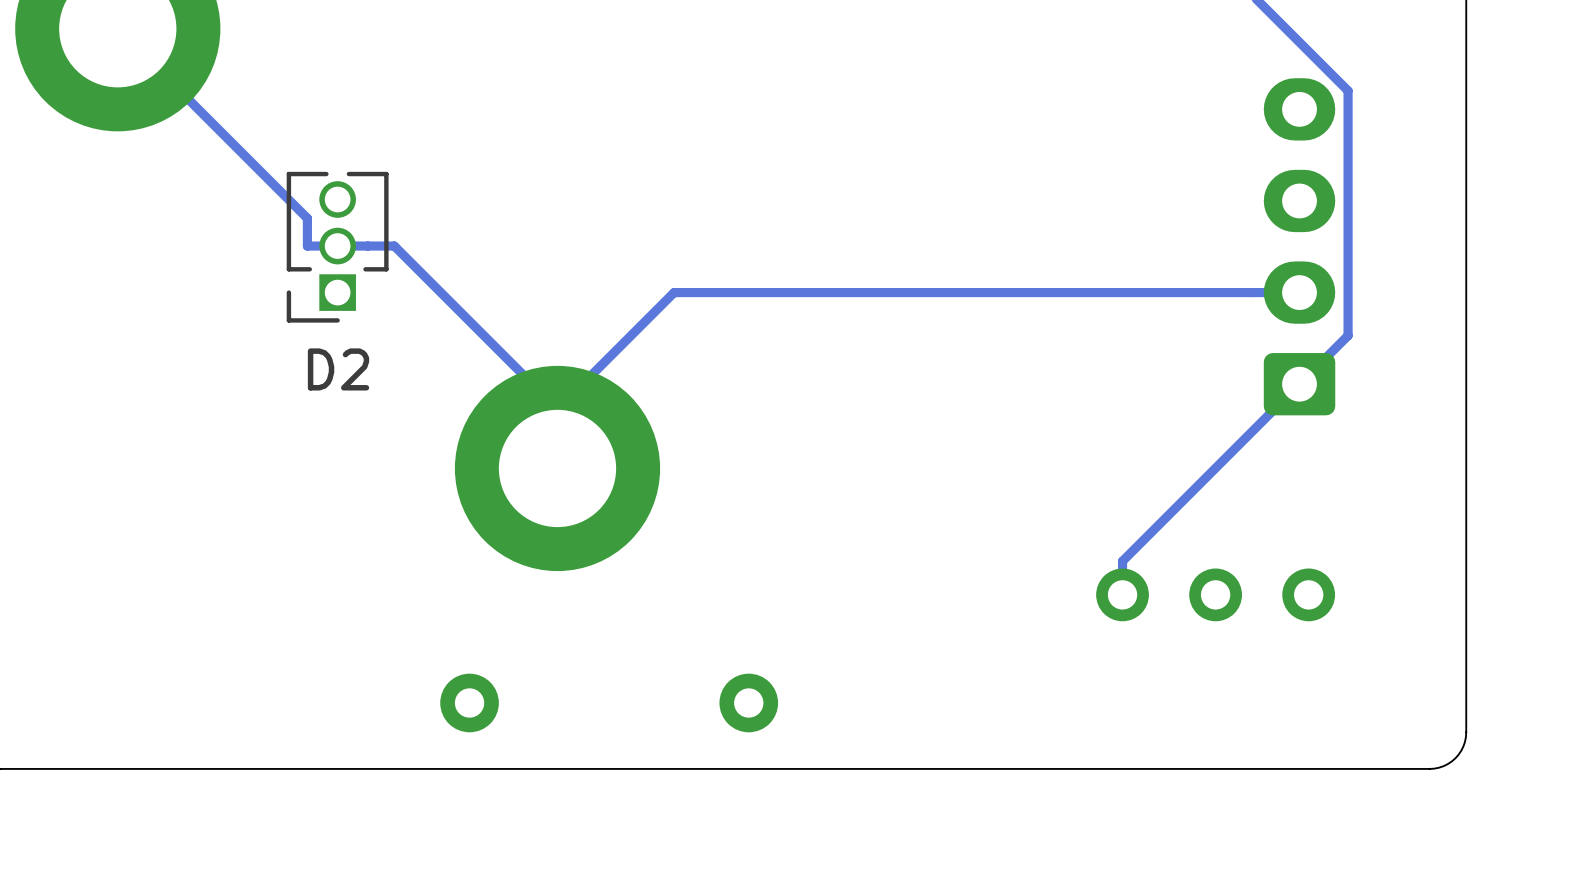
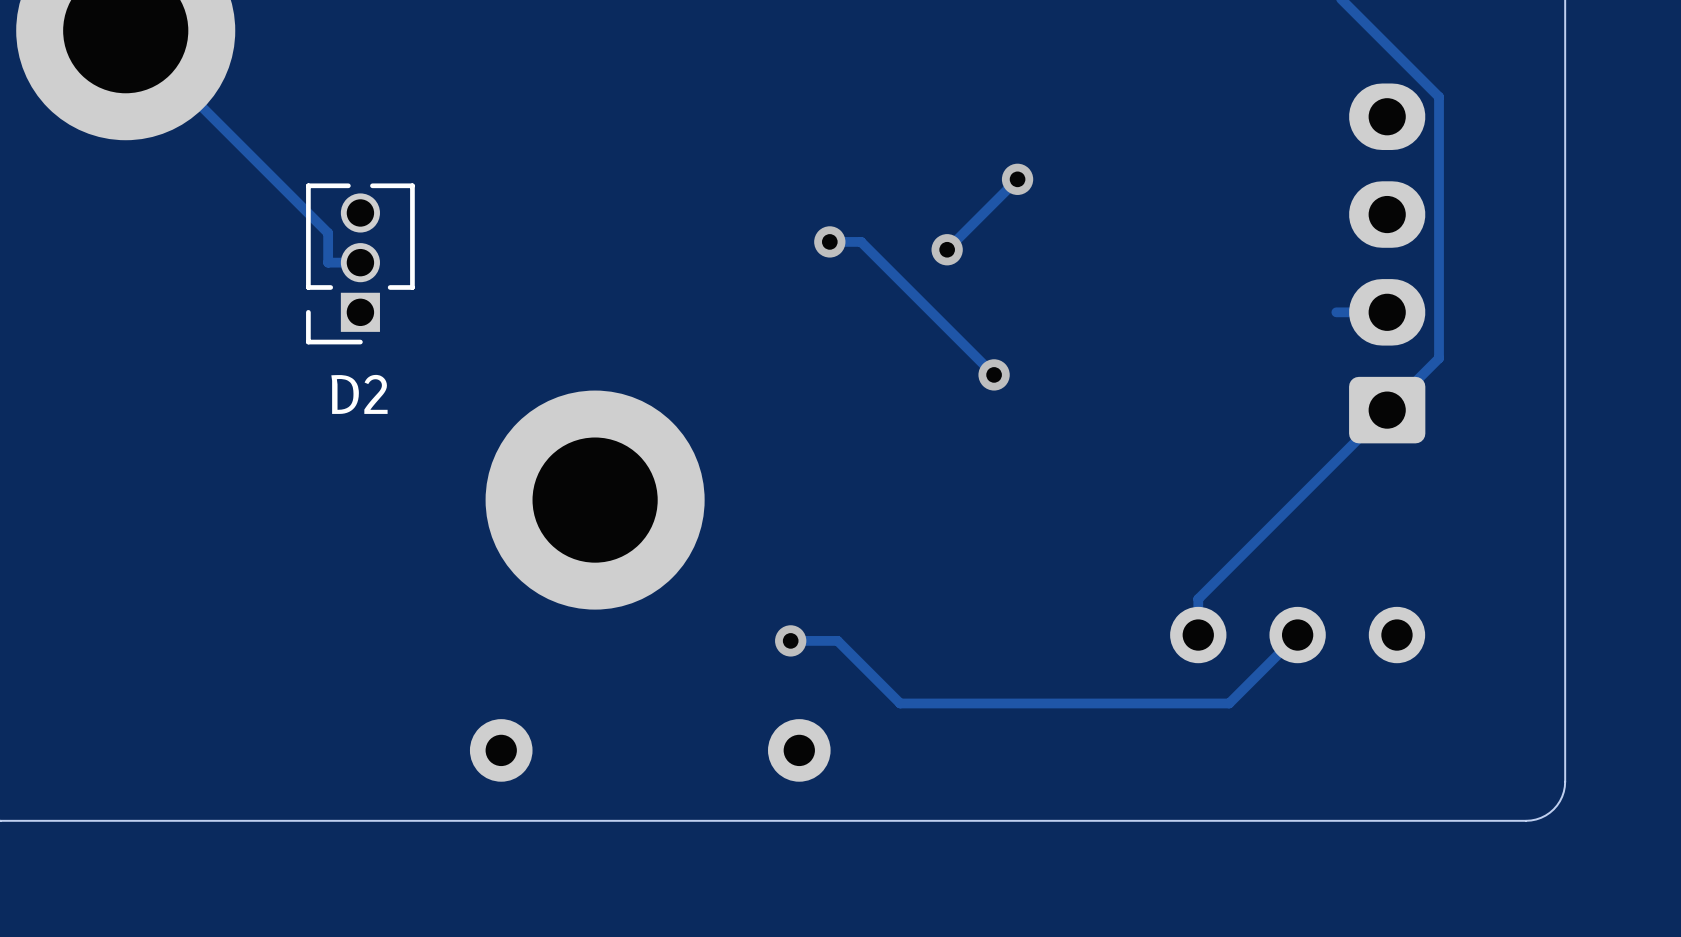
track: none -> (1017, 179) (947, 249)
via: none -> (1017, 179)
track: none -> (829, 241) (861, 241) (994, 374)
via: none -> (829, 241)
via: none -> (947, 249)
track: (337, 246) (394, 246) (557, 409) (674, 292) (1251, 292) -> none
via: none -> (994, 374)
track: none -> (1297, 635) (1229, 703) (900, 703) (837, 640) (790, 640)
via: none -> (790, 640)

